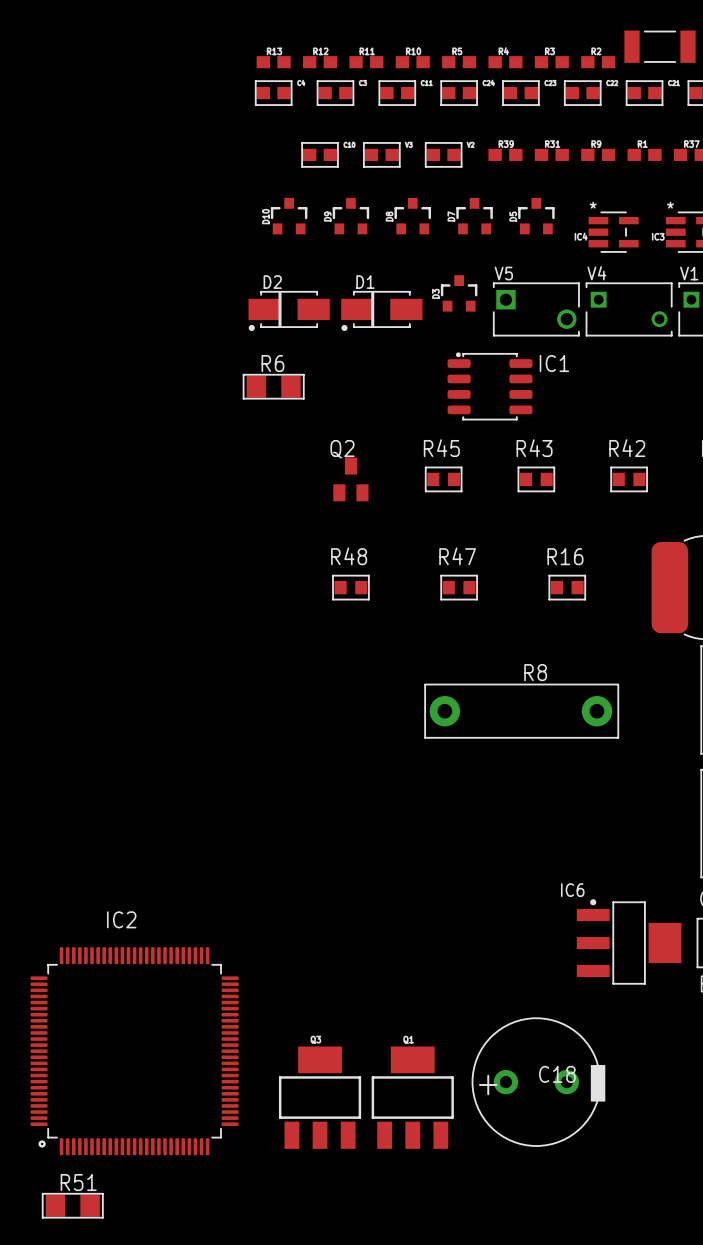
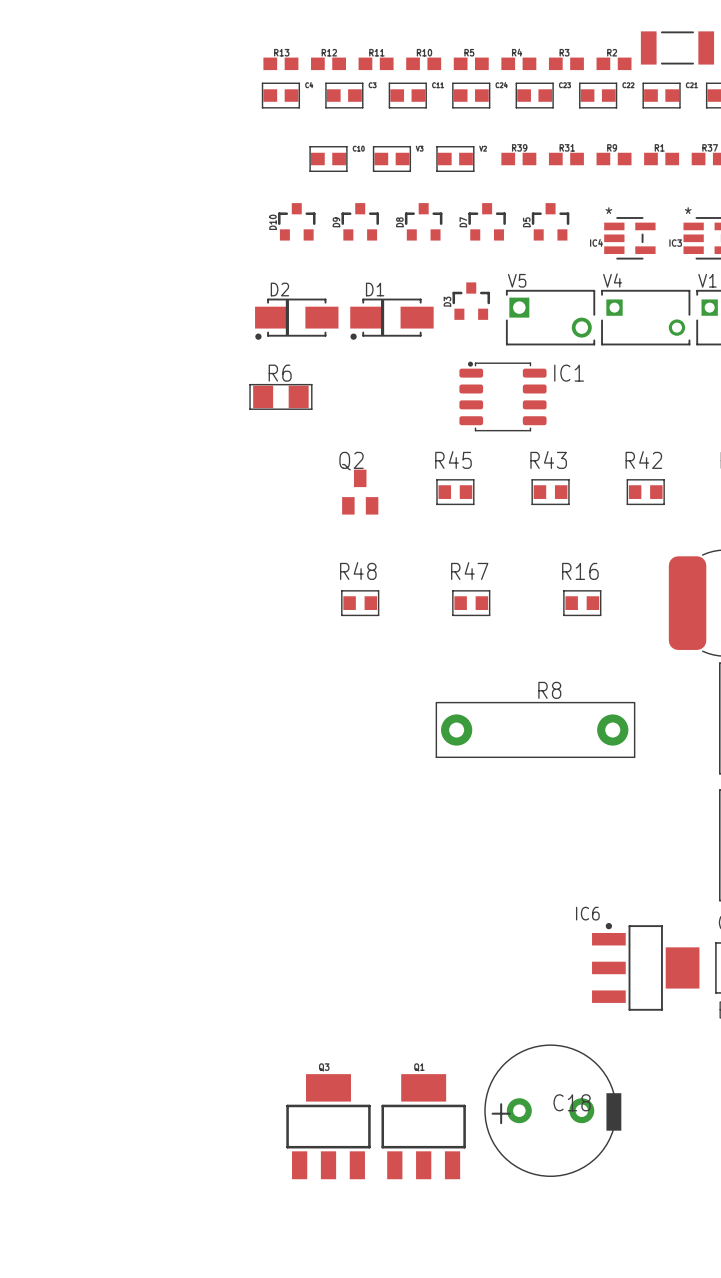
IC2: (134, 1051) -> none
R51: (72, 1205) -> none

